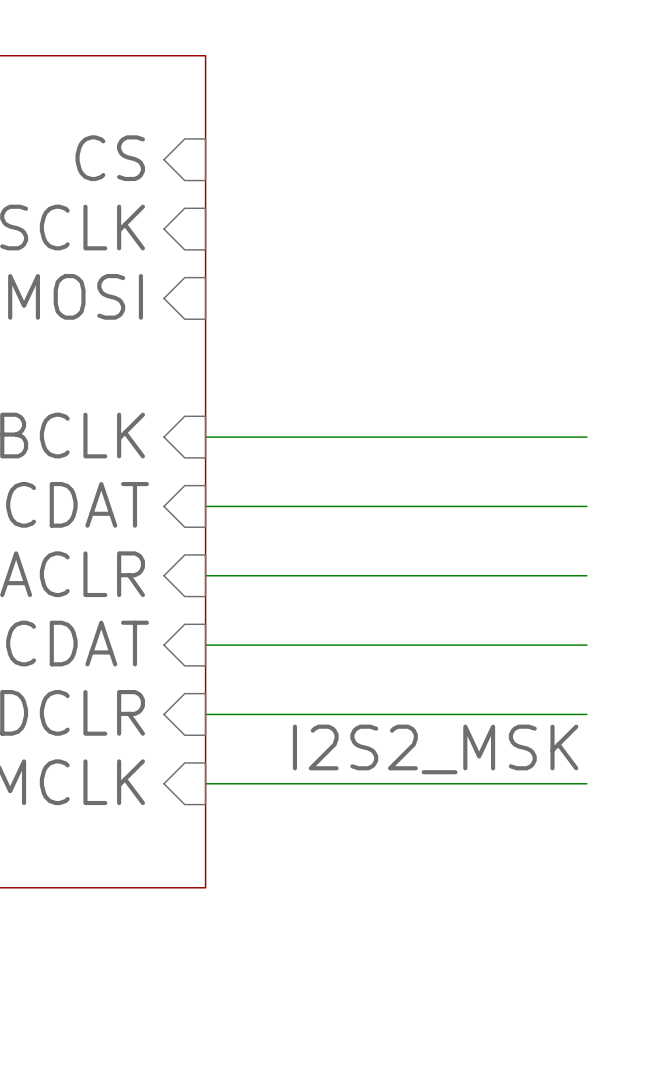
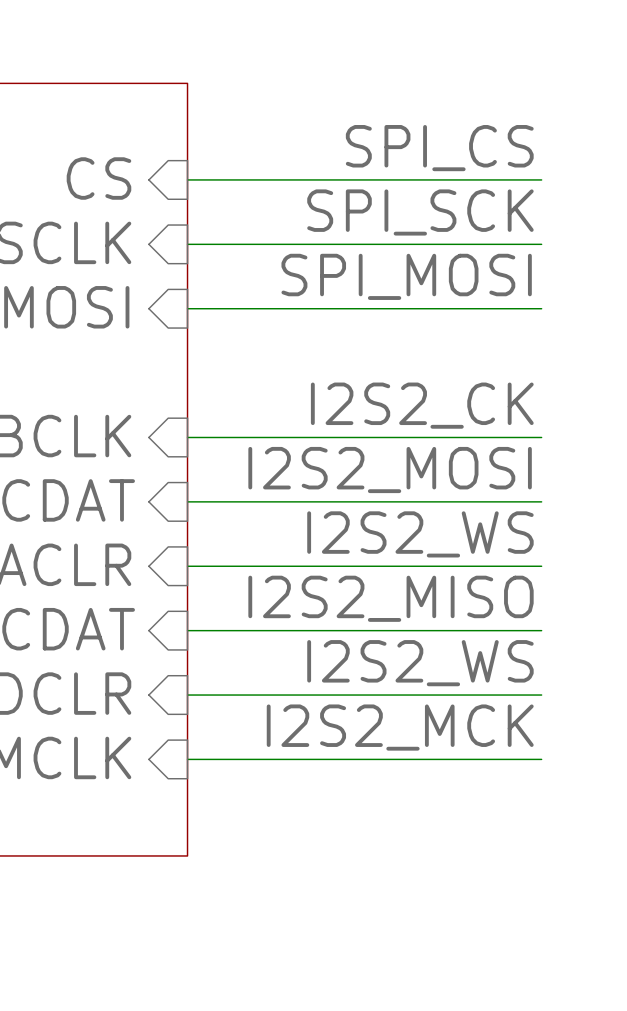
label: none -> SPI_CS (439, 148)
wire: none -> (187, 179) (541, 179)
label: none -> SPI_SCK (420, 212)
wire: none -> (187, 244) (541, 244)
label: none -> SPI_MOSI (406, 276)
wire: none -> (187, 308) (541, 308)
label: none -> I2S2_CK (422, 405)
label: none -> I2S2_MOSI (390, 470)
label: none -> I2S2_WS (420, 534)
label: none -> I2S2_MISO (391, 598)
label: none -> I2S2_WS (420, 663)
label: I2S2_MSK (435, 749) -> I2S2_MCK (400, 727)

